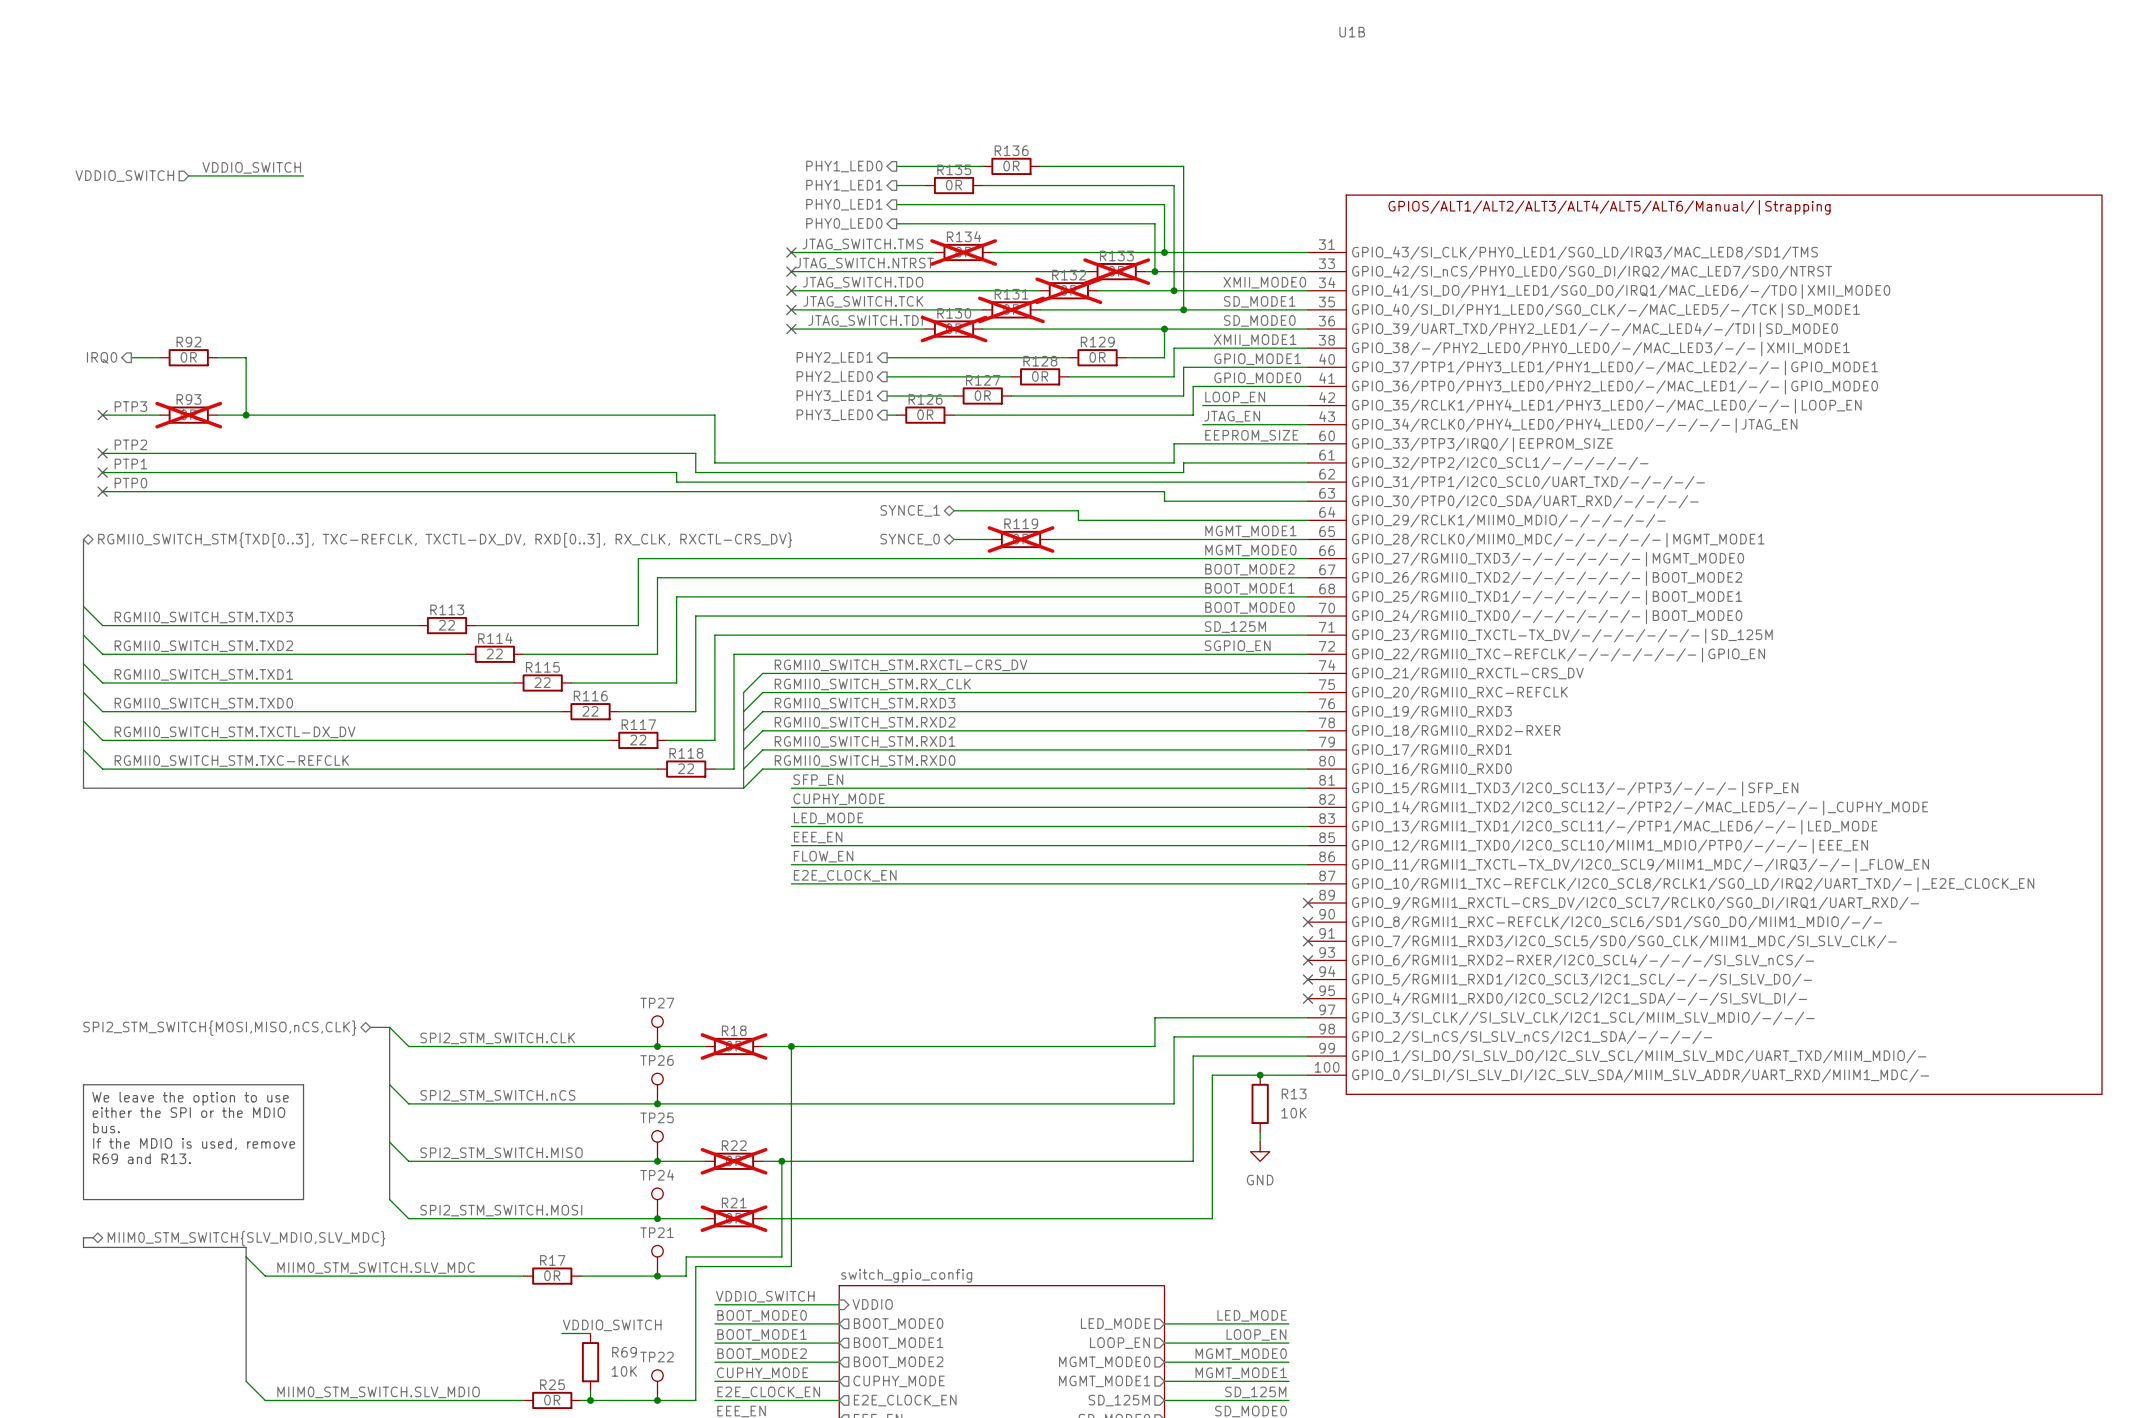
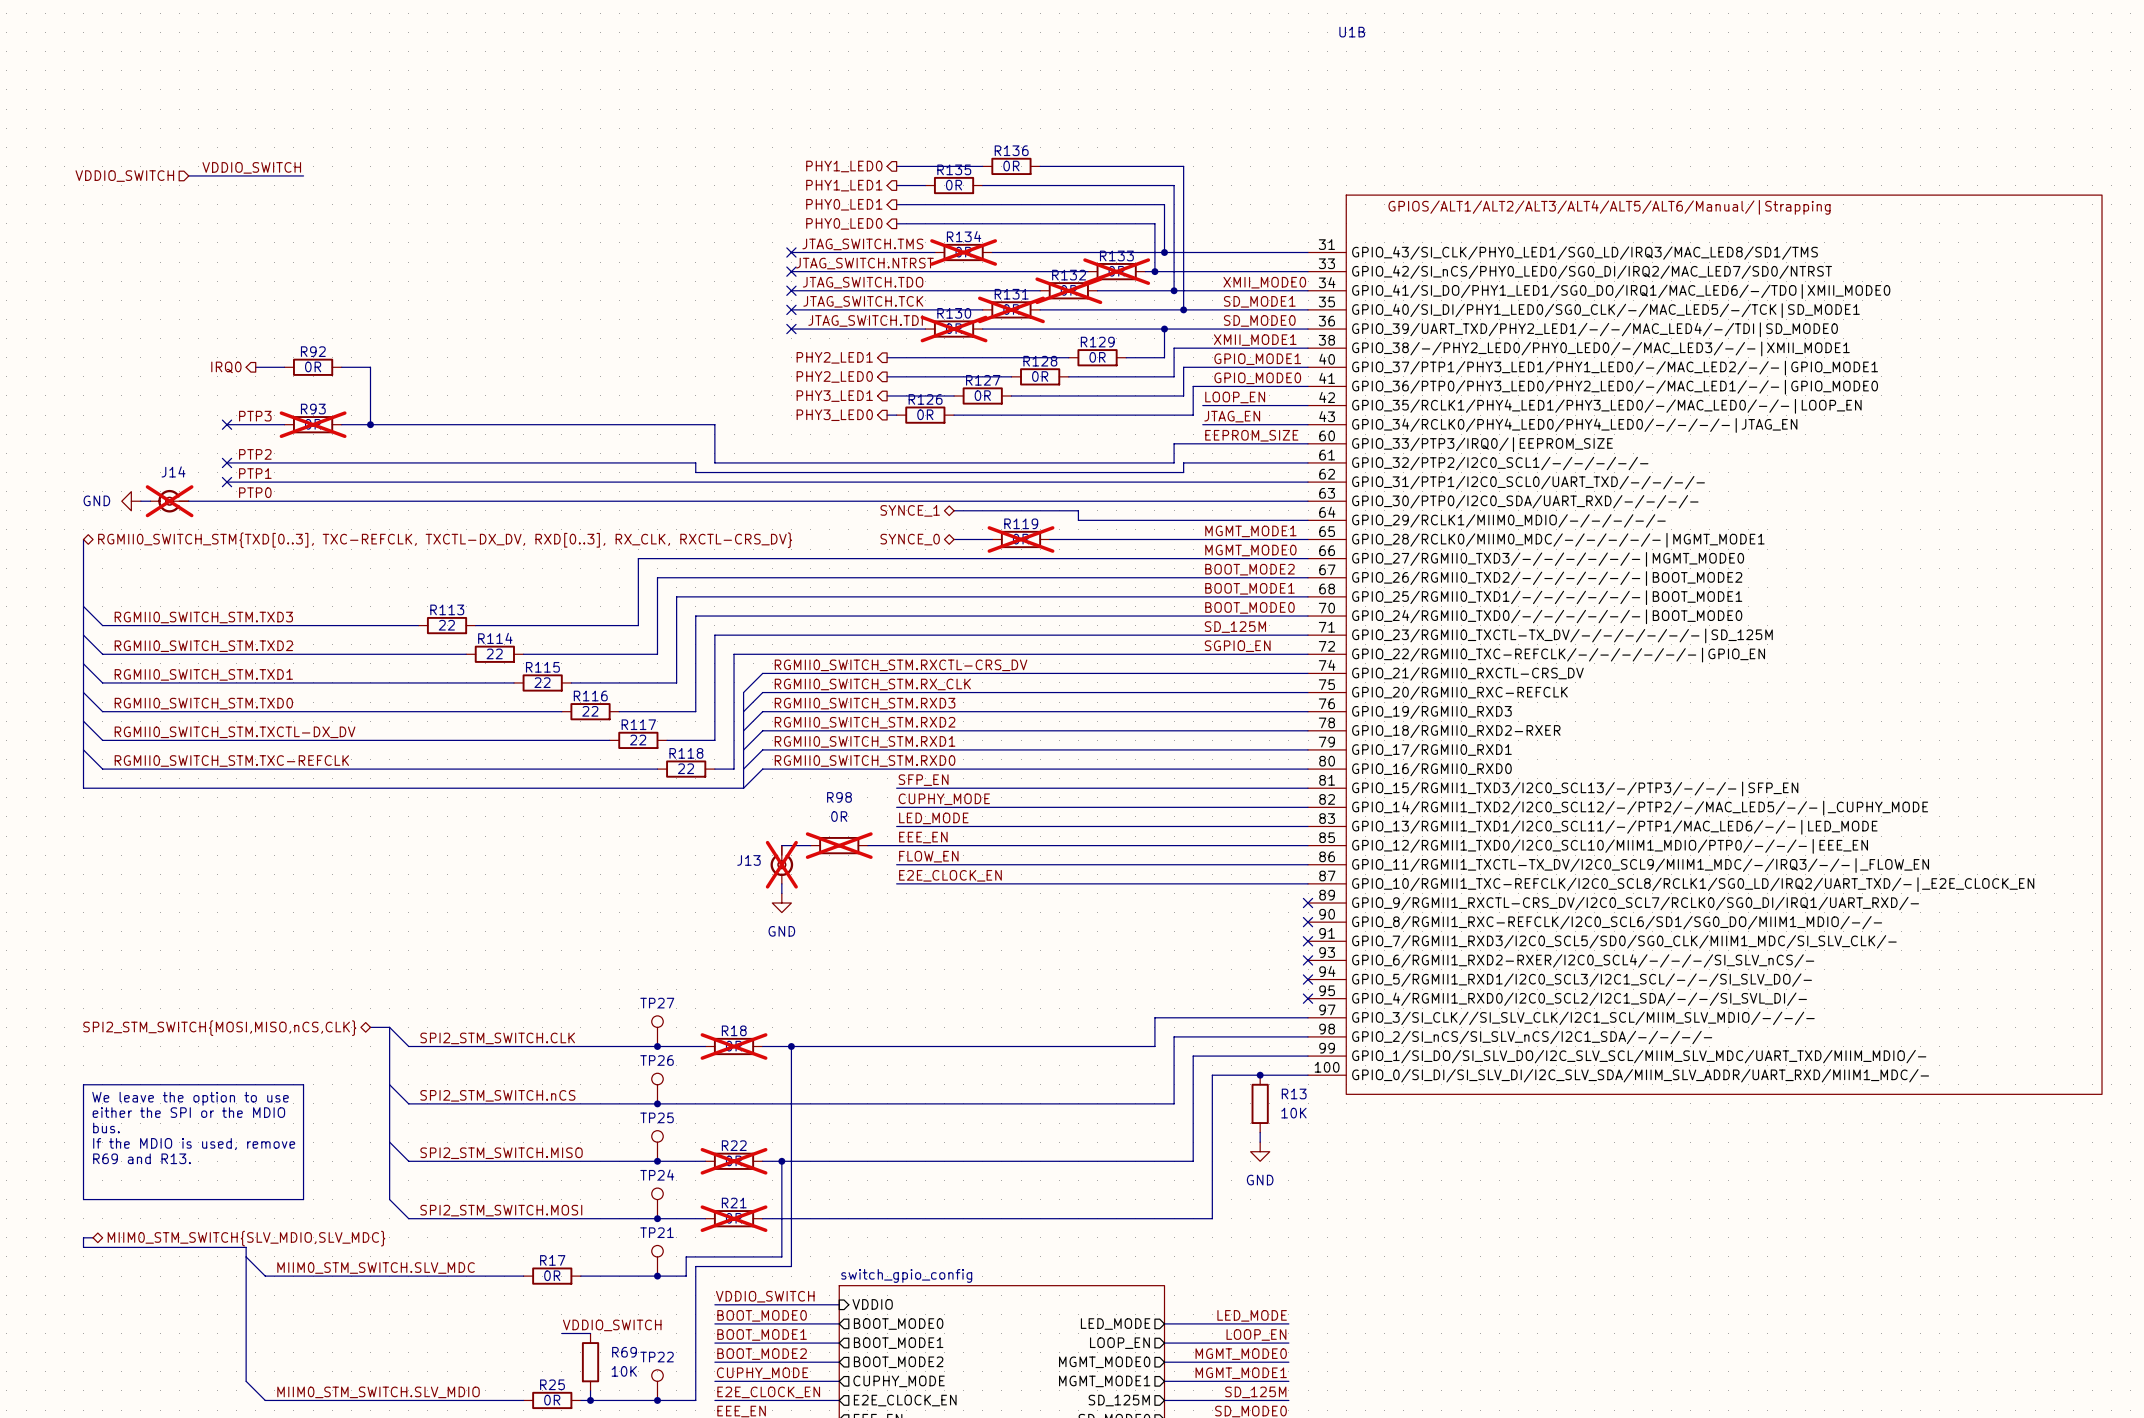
hierarchical label position: IRQ0 (102, 357) -> IRQ0 (226, 367)
wire: (131, 357) (160, 357) -> (255, 367) (284, 367)
R92 position: (188, 357) -> (313, 367)
wire: (217, 357) (246, 357) (246, 415) -> (341, 367) (370, 367) (370, 424)
label position: PTP3 (130, 406) -> PTP3 (255, 416)
wire: (102, 415) (160, 415) -> (227, 424) (284, 424)
no-connect mark: (102, 415) -> none
R93 position: (188, 415) -> (313, 424)
wire: (217, 415) (714, 415) (714, 424) -> (341, 424) (714, 424)
junction: (246, 415) -> none
no-connect mark: none -> (227, 424)
junction: none -> (370, 424)
label position: PTP2 (130, 444) -> PTP2 (255, 454)
wire: (102, 453) (695, 453) (695, 462) -> (227, 462) (695, 462)
no-connect mark: (102, 453) -> none
no-connect mark: none -> (227, 462)
label position: PTP1 (130, 463) -> PTP1 (255, 473)
wire: (102, 472) (676, 472) (676, 482) -> (227, 482) (676, 482)
no-connect mark: (102, 472) -> none
no-connect mark: none -> (227, 482)
label position: PTP0 (130, 483) -> PTP0 (255, 492)
wire: (102, 491) (1164, 491) (1164, 501) -> (188, 501) (1164, 501)
no-connect mark: (102, 491) -> none
power symbol: none -> GND (131, 501)
wire: none -> (140, 501) (150, 501)
J14: none -> (169, 501)
label position: SFP_EN (818, 780) -> SFP_EN (923, 780)
wire: (791, 788) (896, 788) -> none
label position: CUPHY_MODE (839, 799) -> CUPHY_MODE (944, 799)
wire: (791, 807) (896, 807) -> none
label position: LED_MODE (828, 818) -> LED_MODE (933, 818)
wire: (791, 826) (896, 826) -> none
label position: EEE_EN (818, 837) -> EEE_EN (923, 837)
wire: none -> (781, 845) (791, 845)
R98: none -> 0R (839, 845)
label position: FLOW_EN (823, 856) -> FLOW_EN (928, 856)
J13: none -> (781, 864)
wire: (791, 864) (896, 864) -> none
label position: E2E_CLOCK_EN (845, 875) -> E2E_CLOCK_EN (950, 875)
wire: none -> (781, 883) (781, 893)
wire: (791, 883) (896, 883) -> none
power symbol: none -> GND (781, 903)

